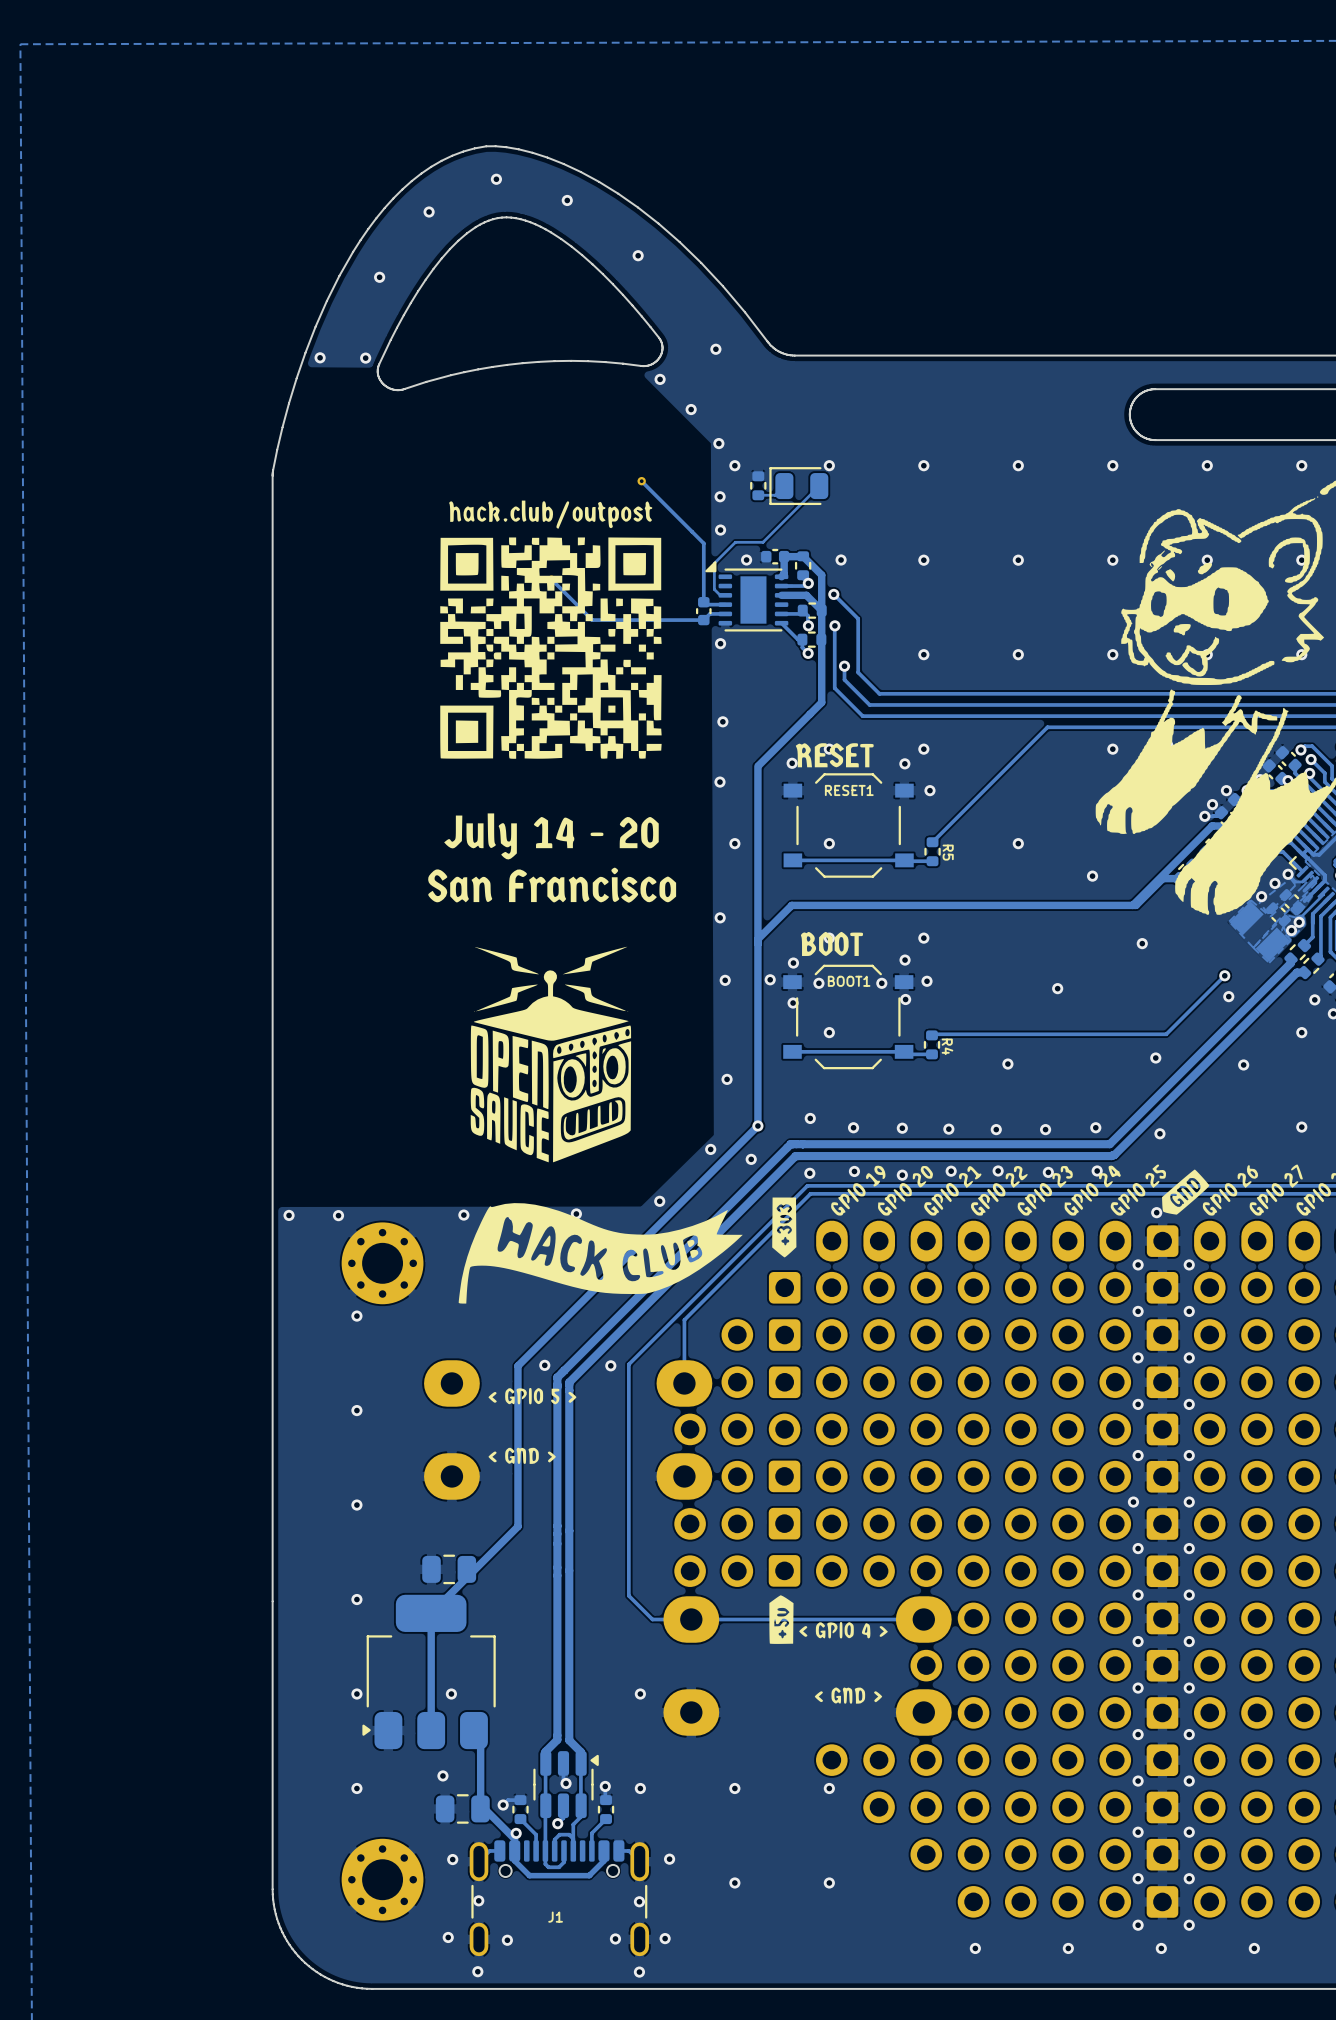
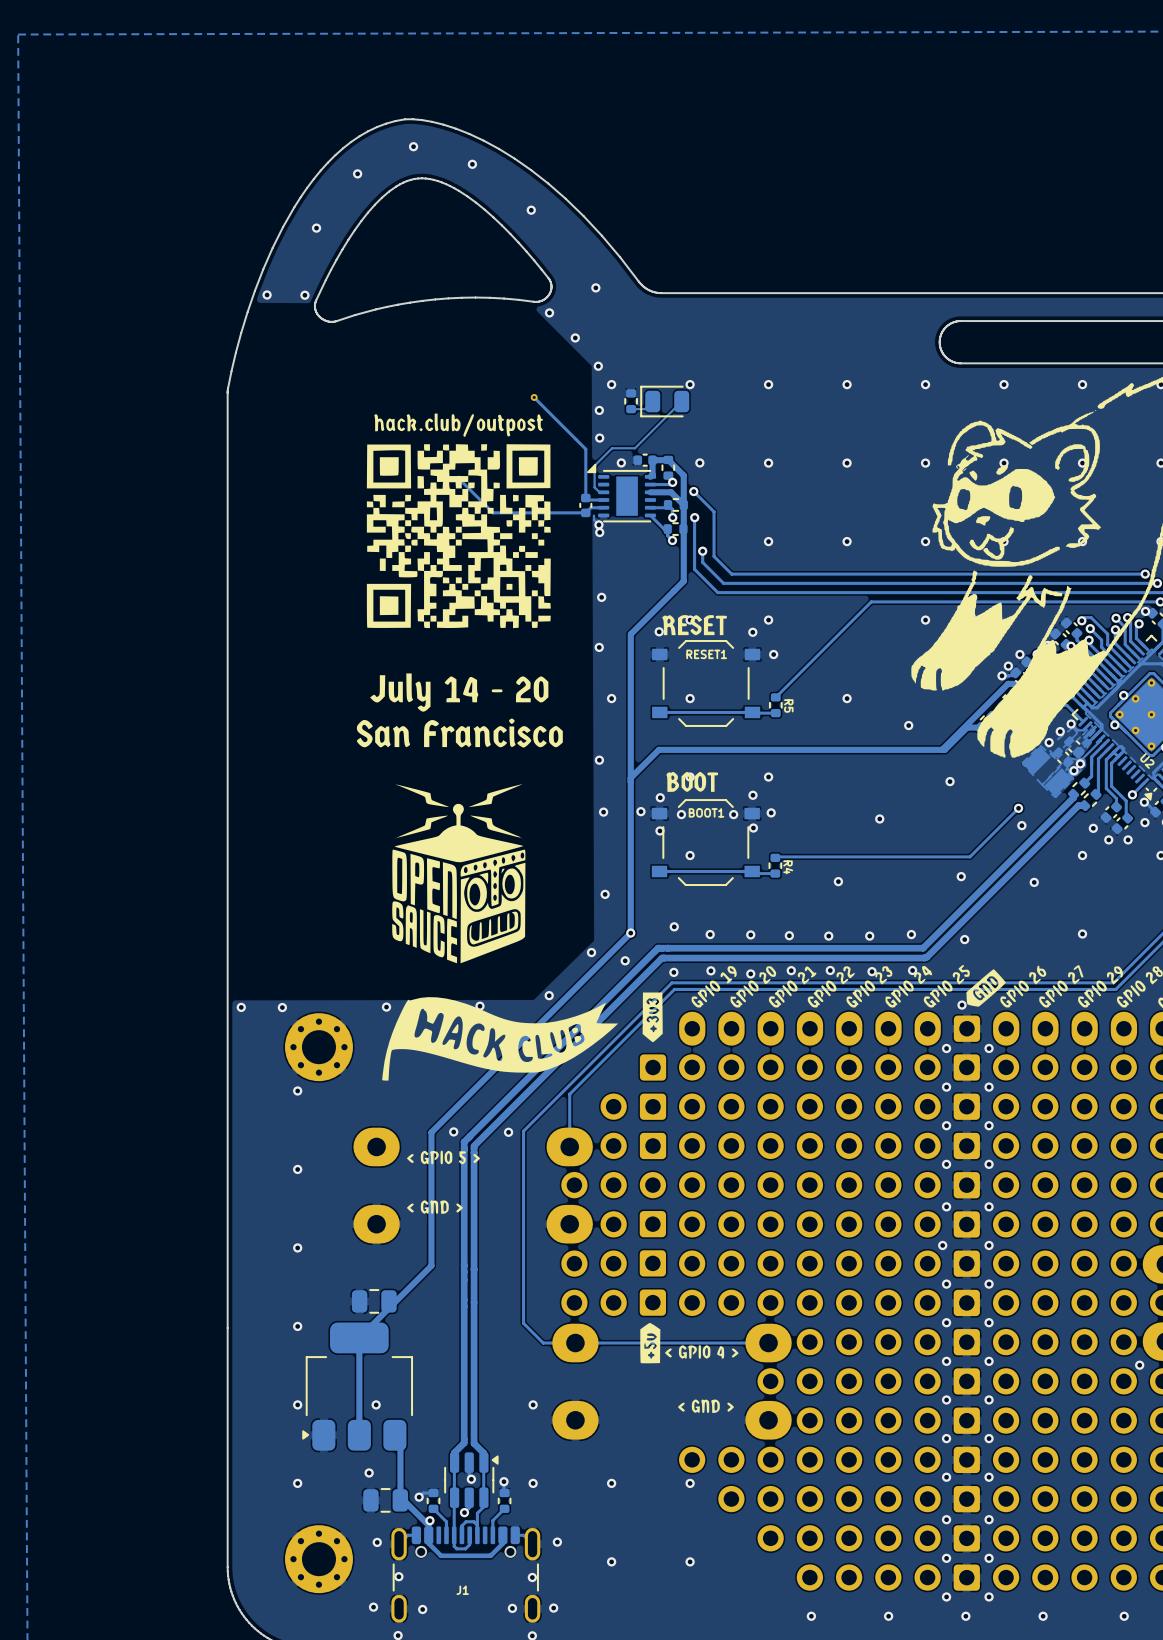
track: none -> (593, 515) (593, 519) (598, 524)
via: none -> (598, 524)

